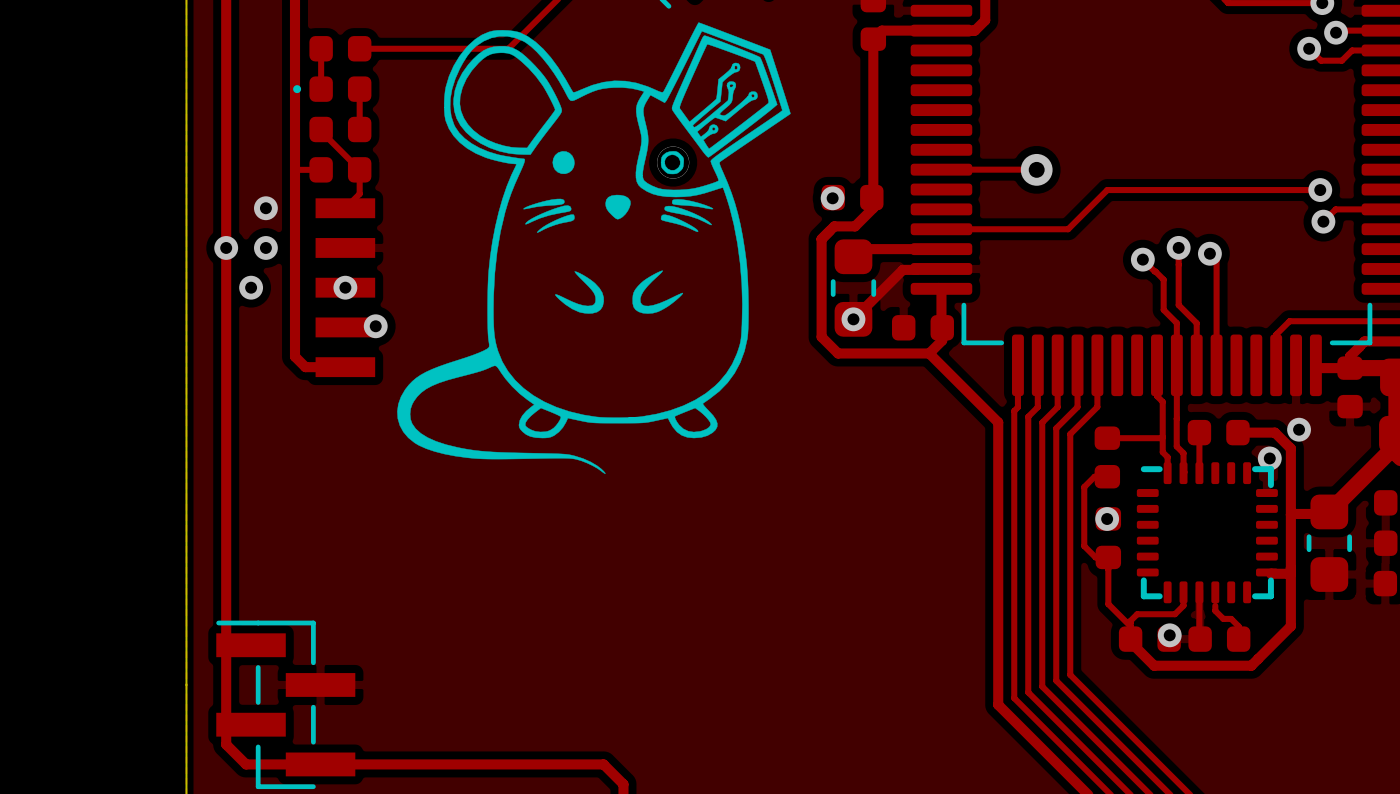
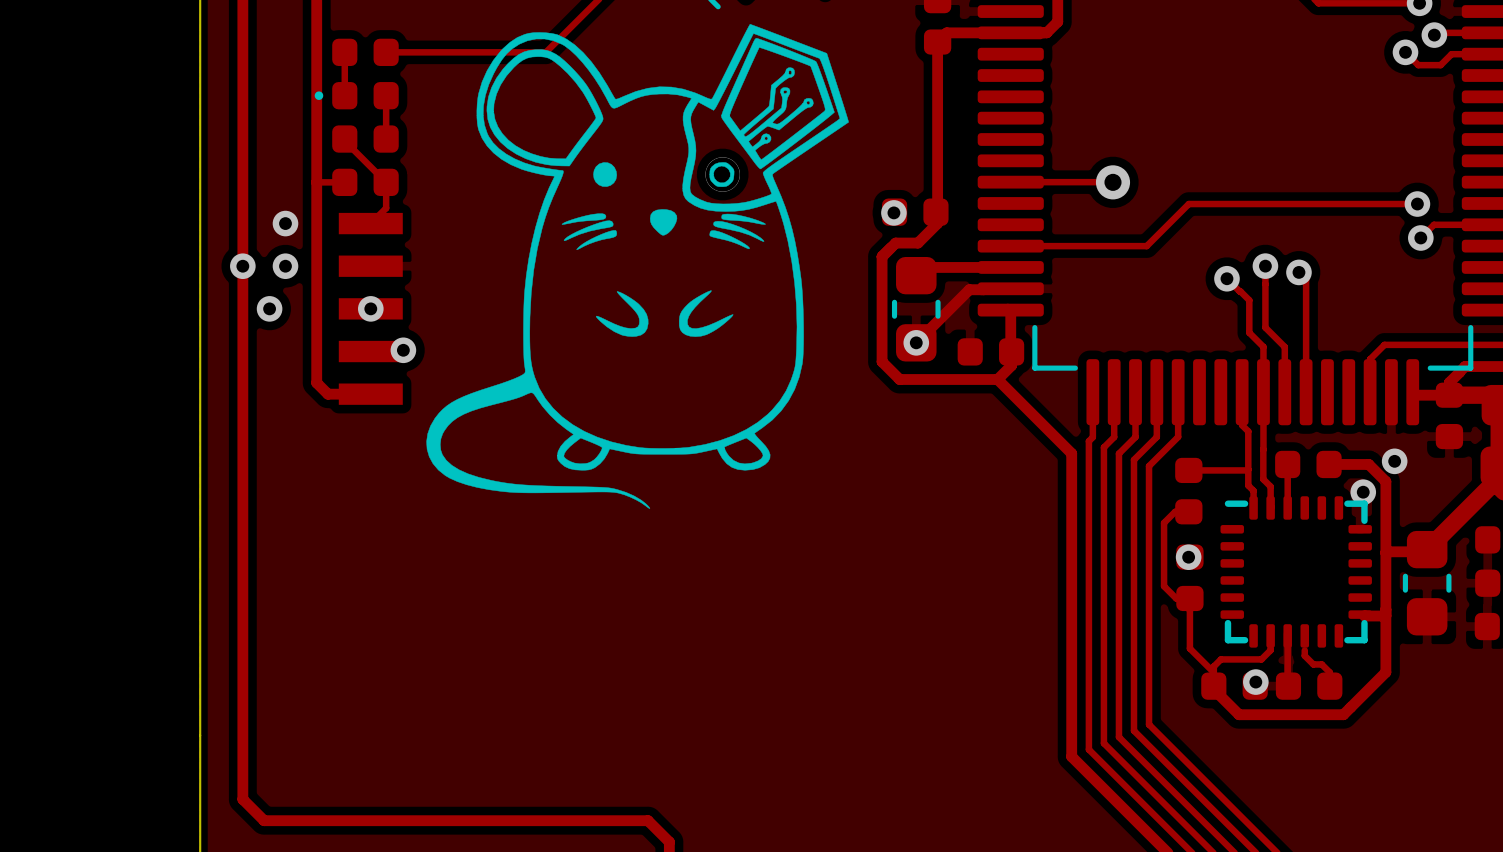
part: (285, 704) -> none

